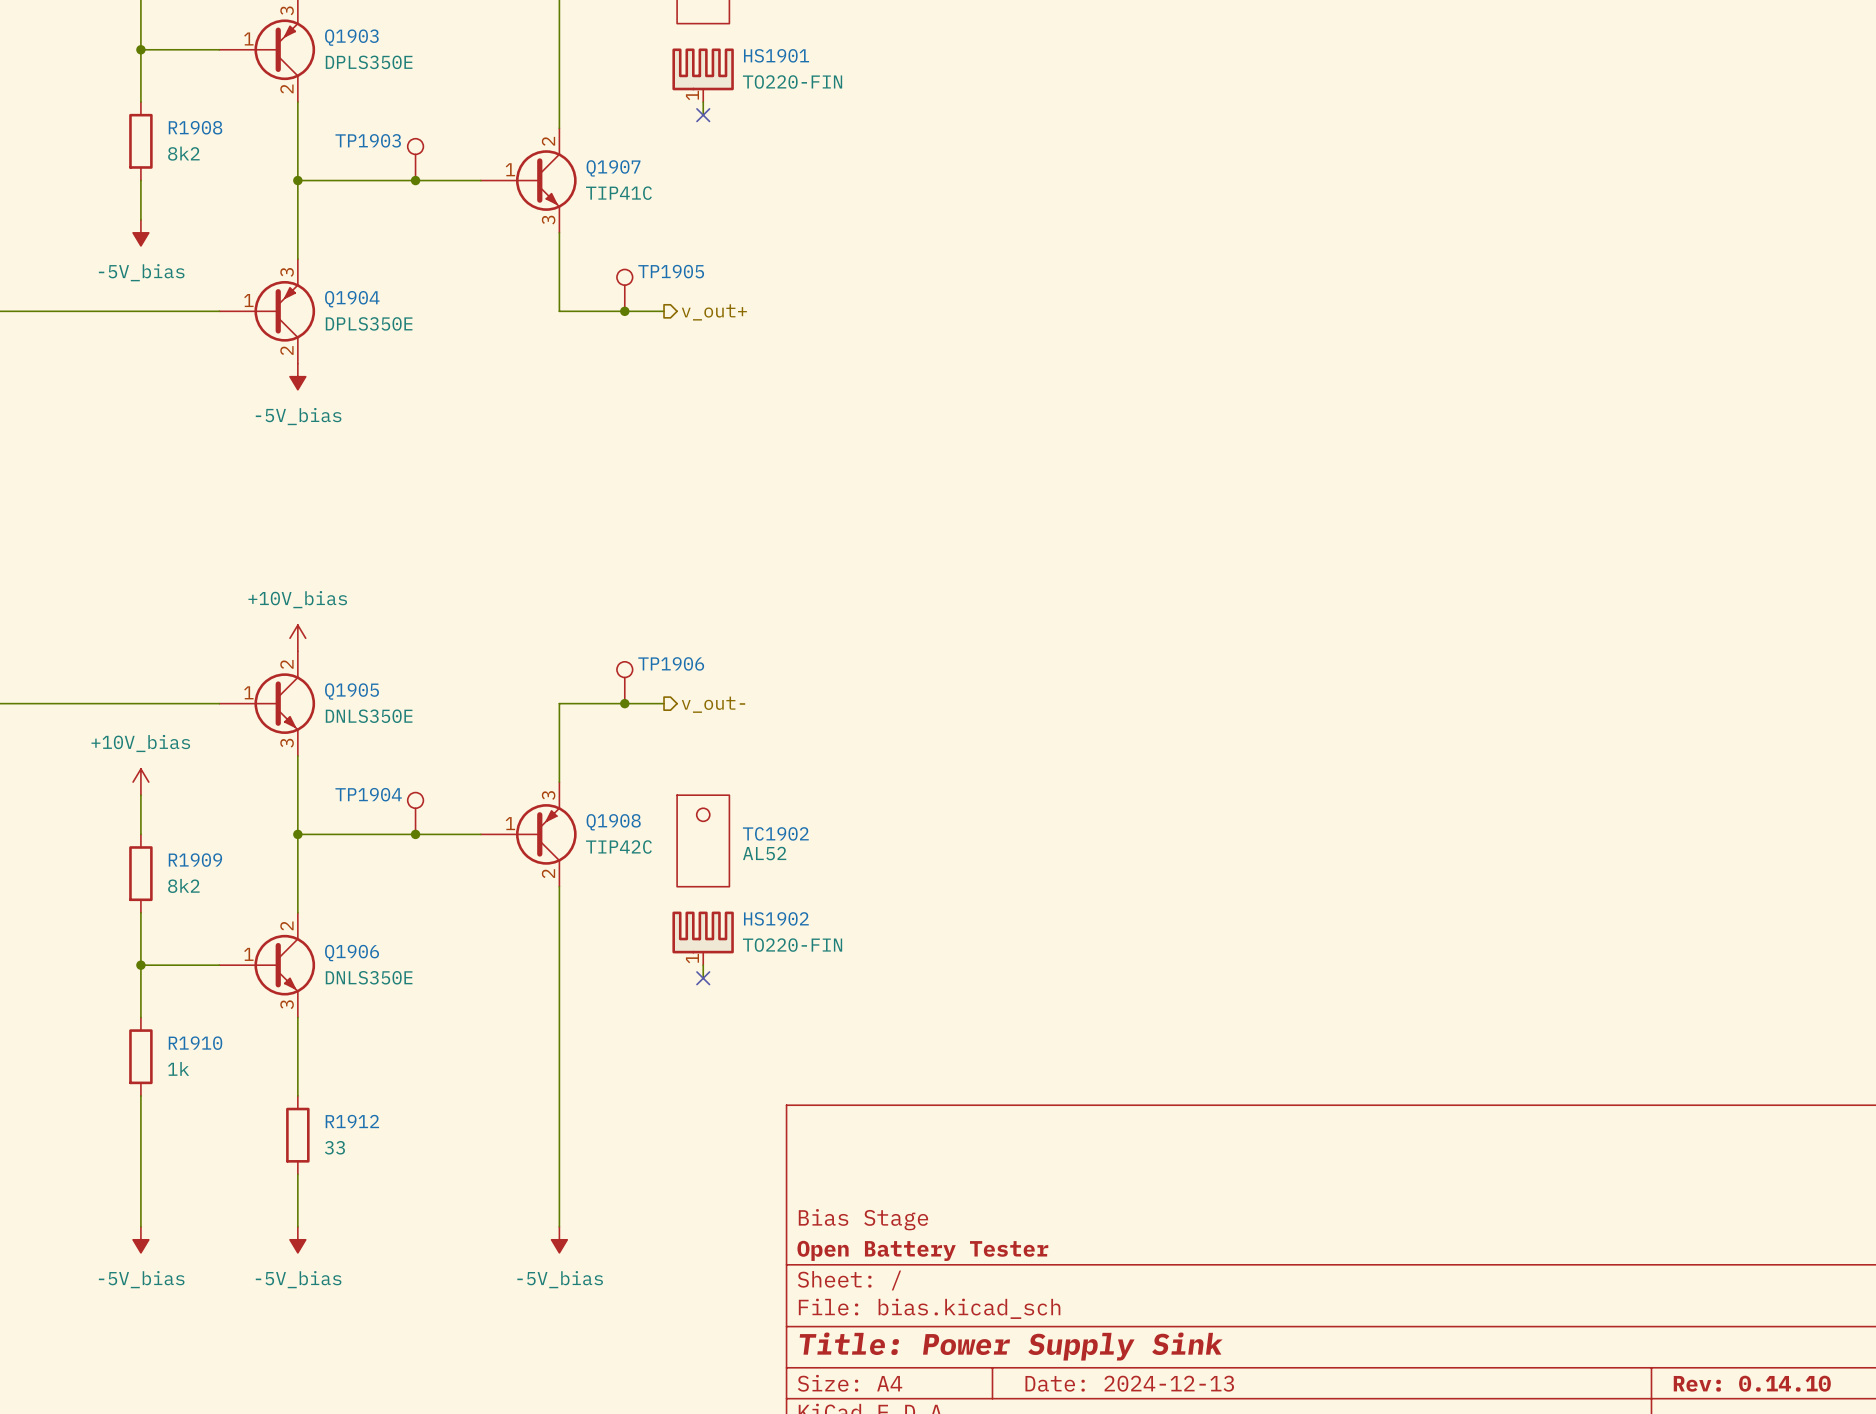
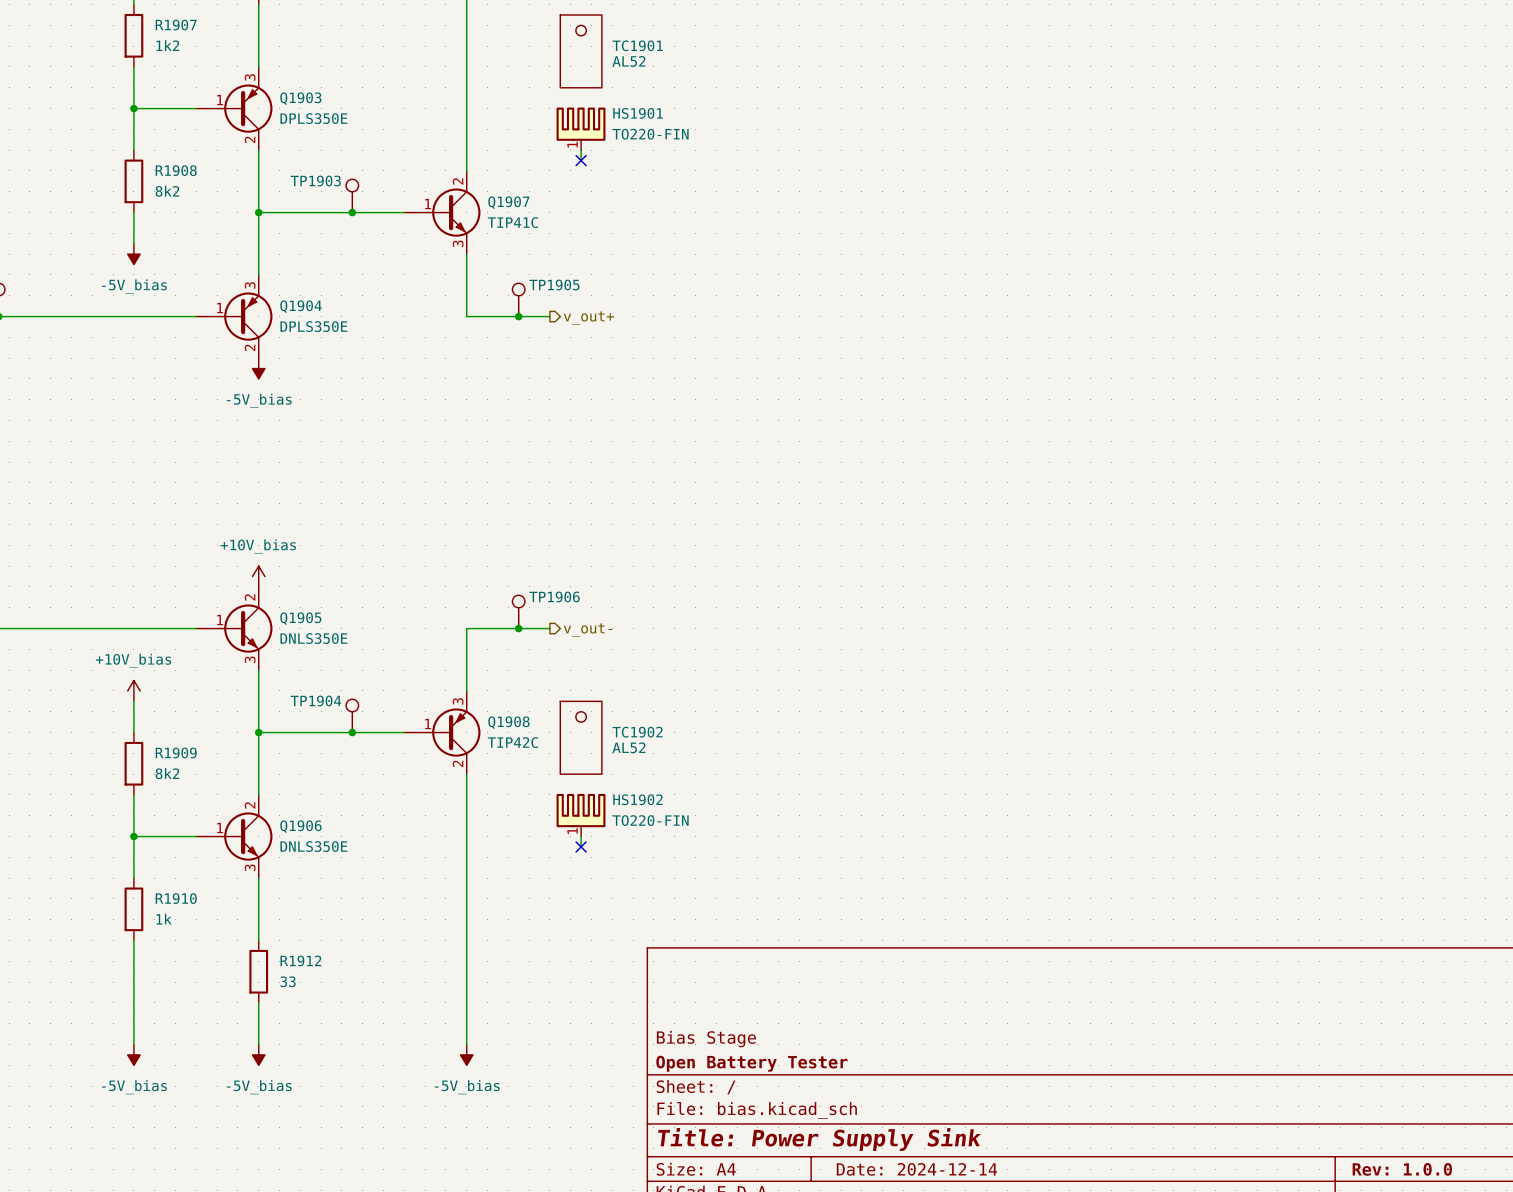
title block: Date: 2024-12-13 (1129, 1383) -> Date: 2024-12-14 (916, 1169)
title block: Rev: 0.14.10 (1752, 1383) -> Rev: 1.0.0 (1402, 1169)

